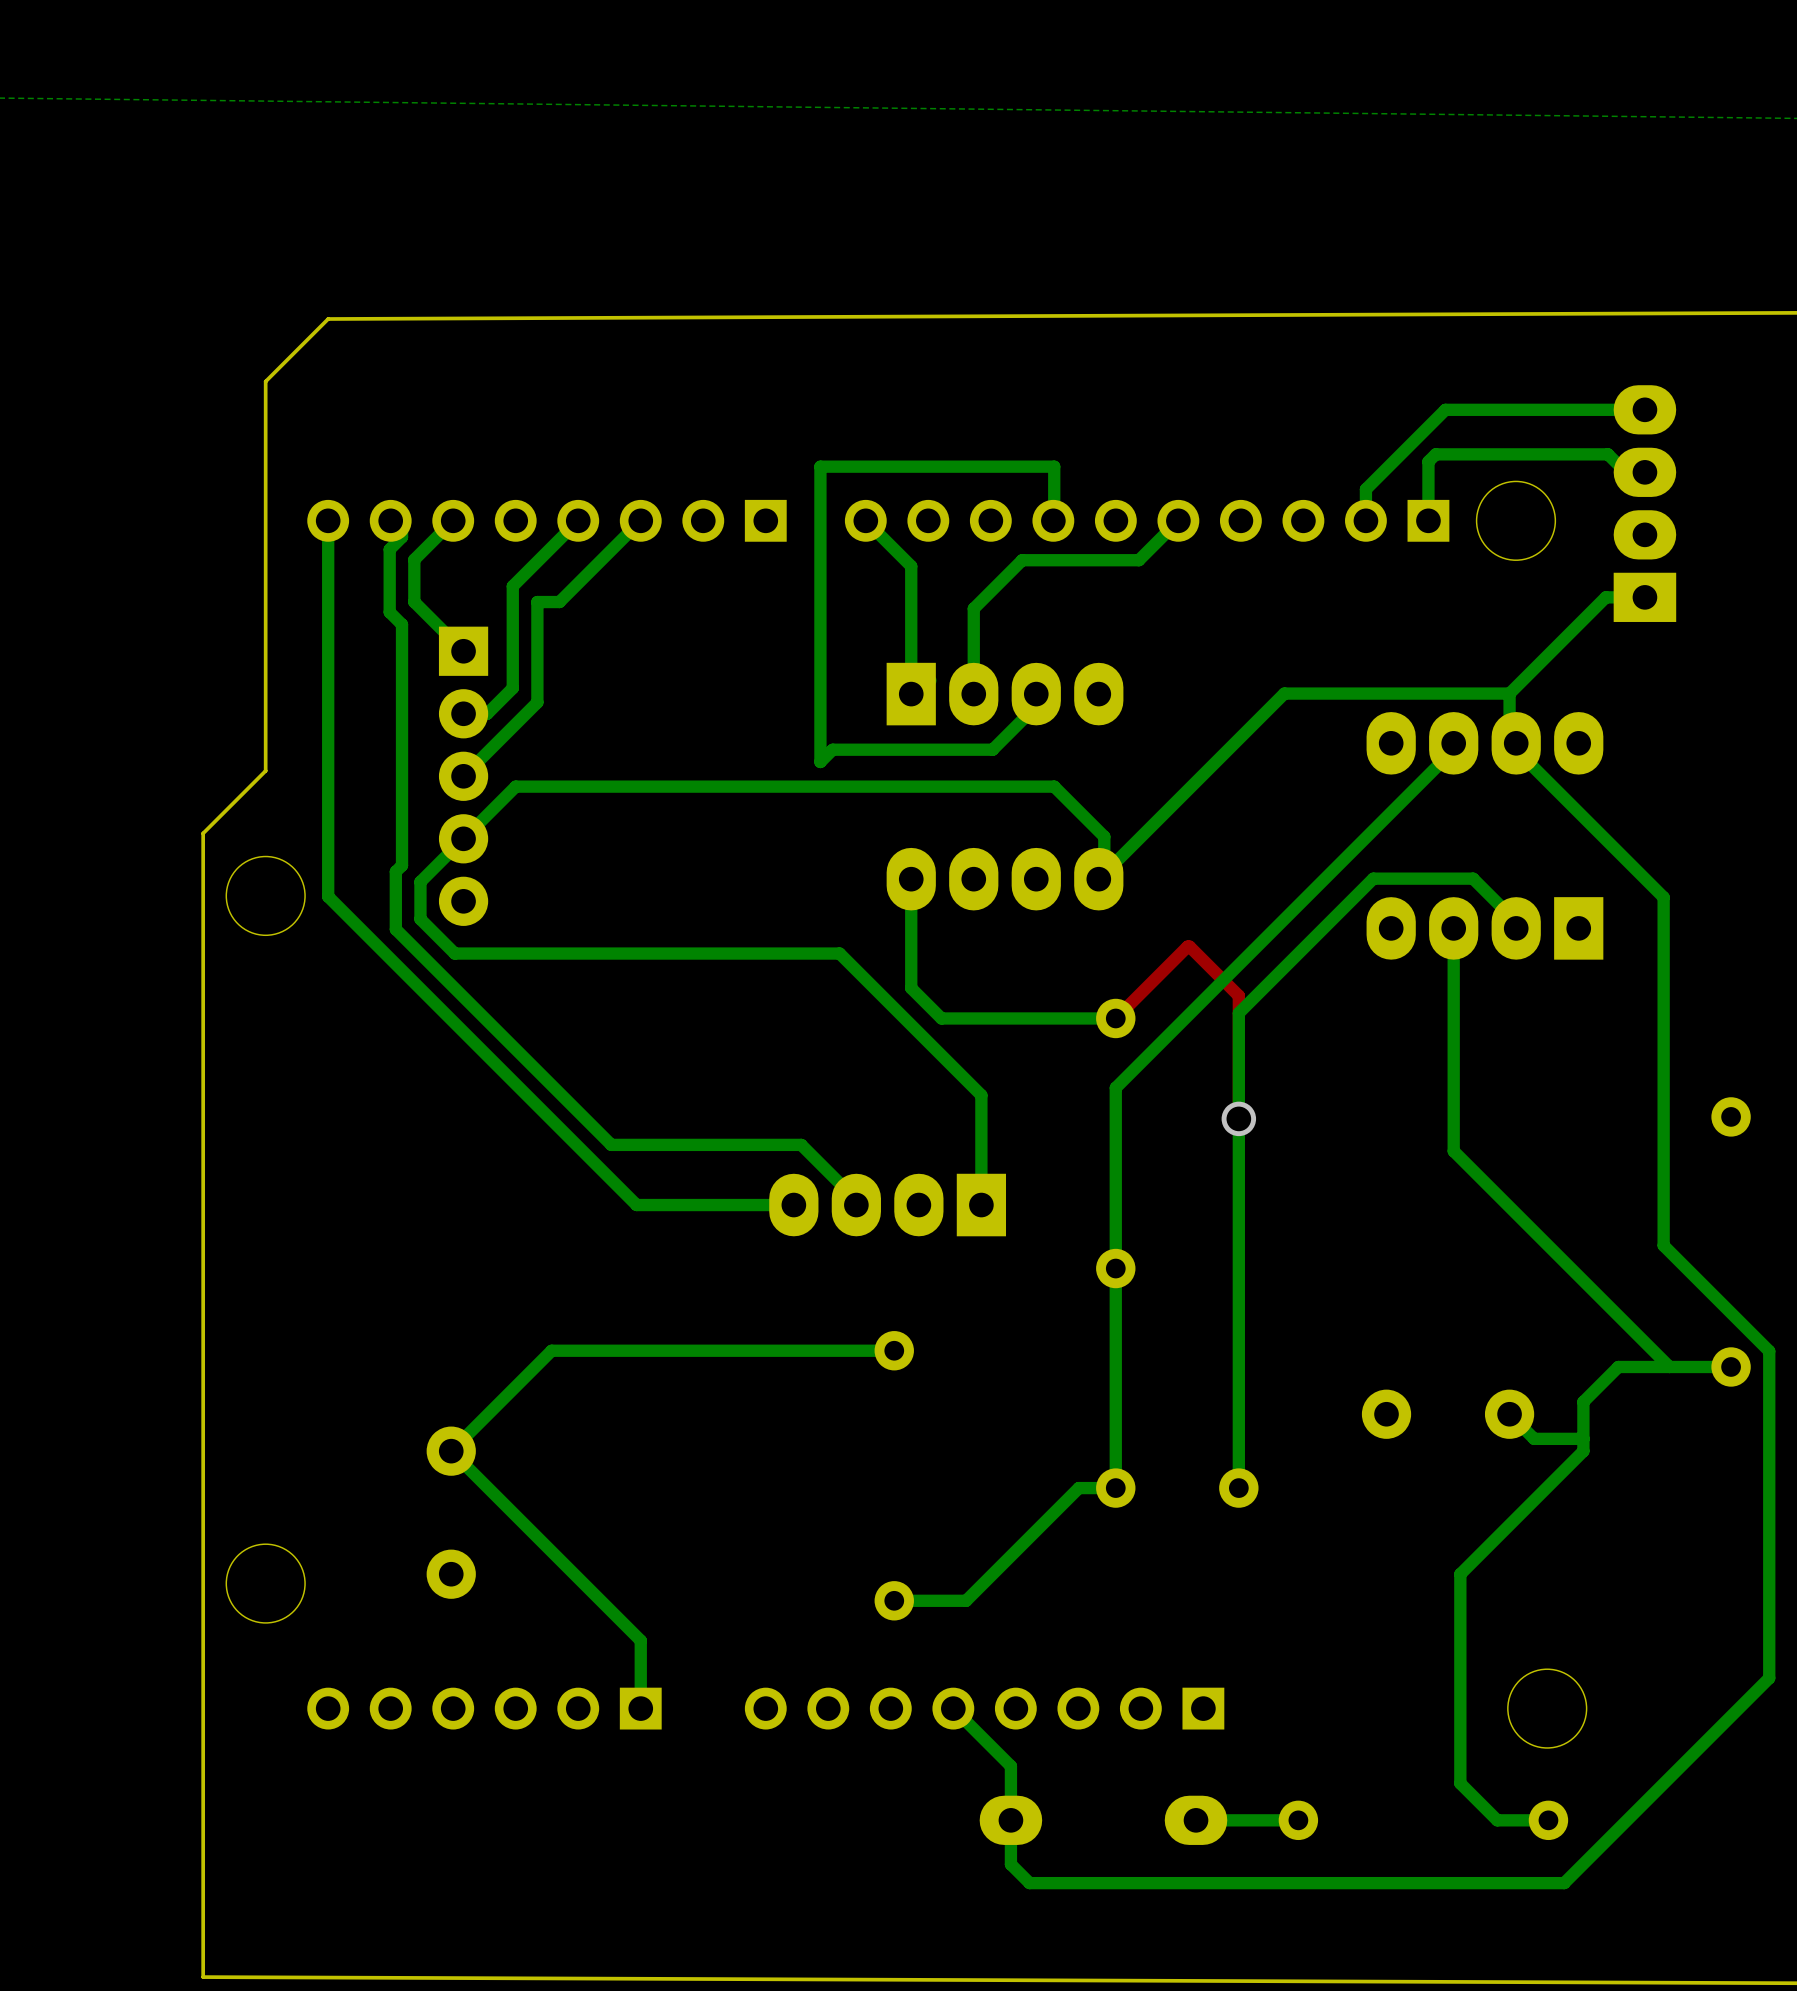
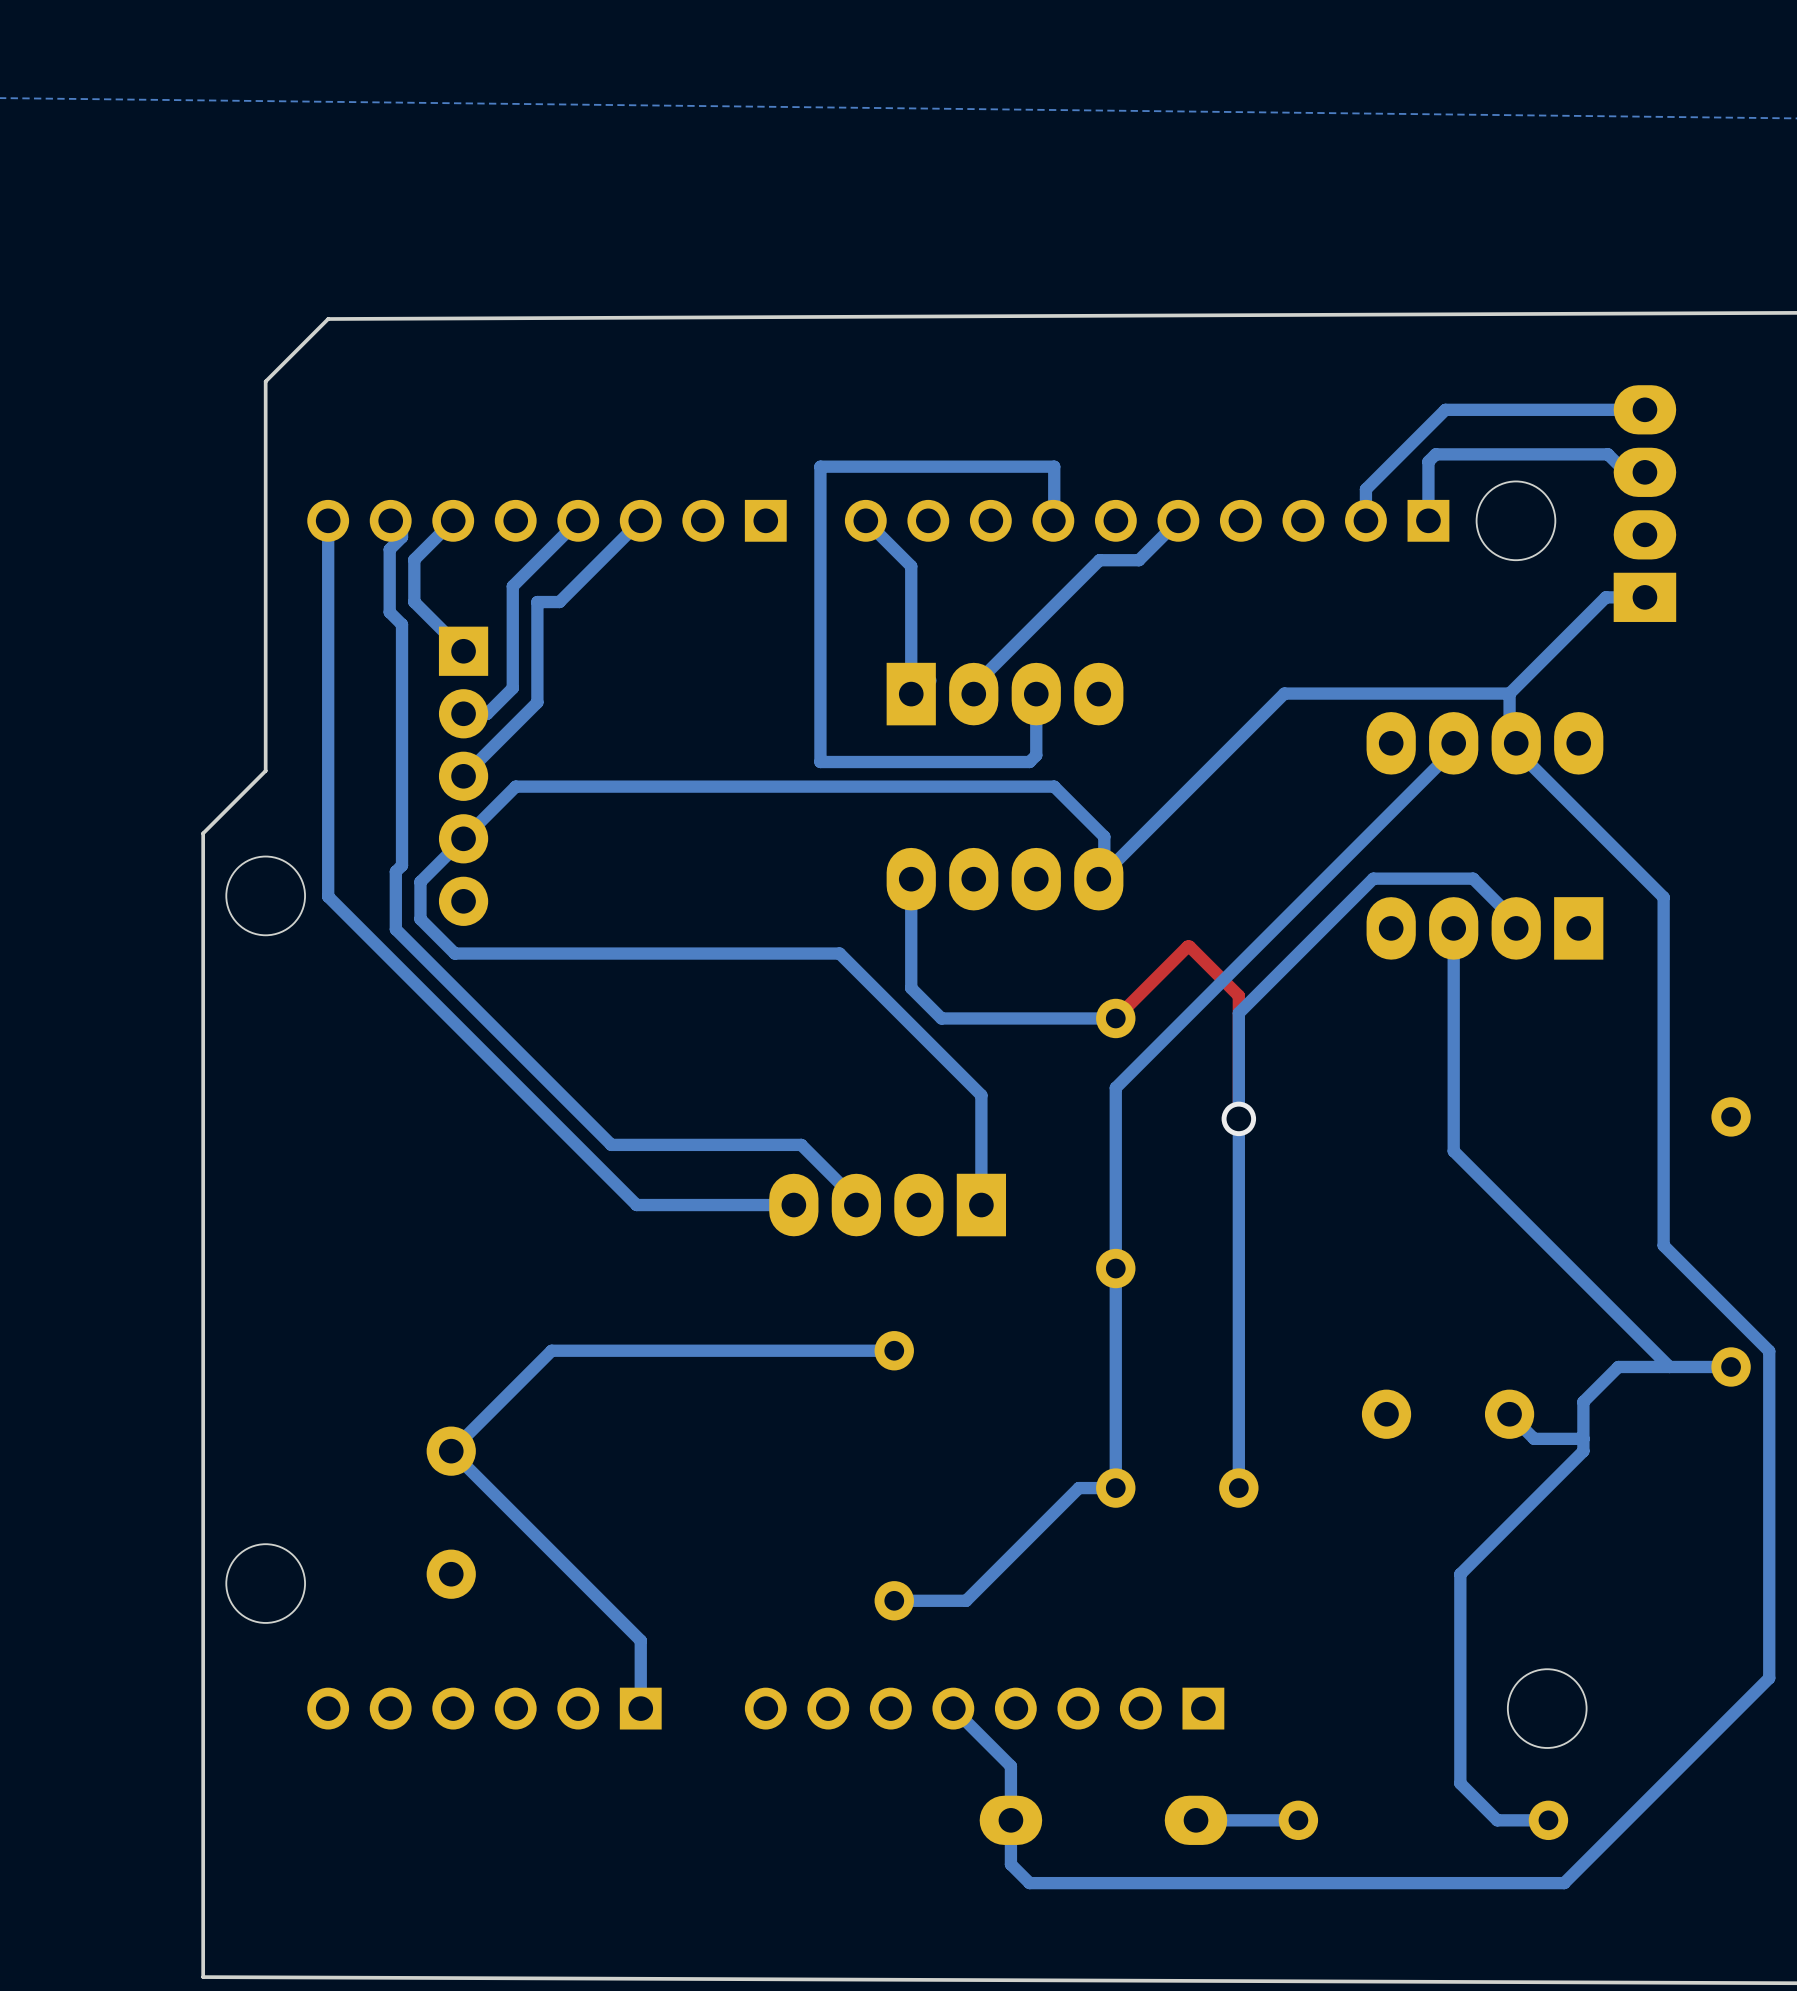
bottom track: (1099, 560) (1022, 560) (973, 608) (973, 686) -> (1099, 560) (973, 686)
bottom track: (1036, 706) (992, 749) (832, 749) (820, 762) -> (1036, 706) (1036, 755) (1029, 762) (820, 762)

